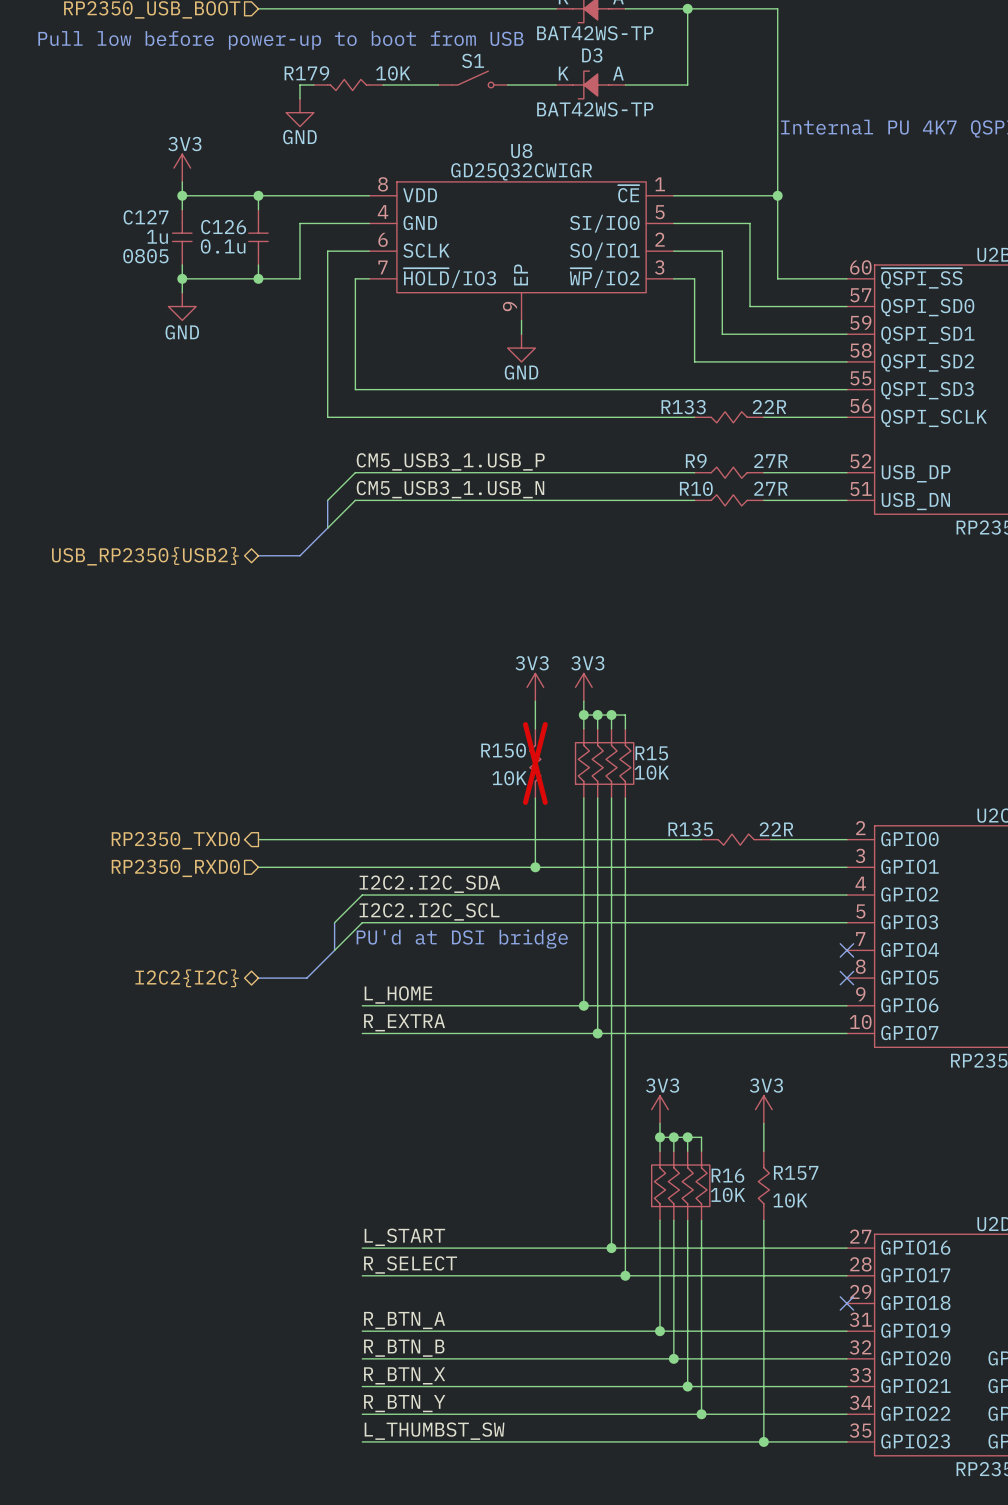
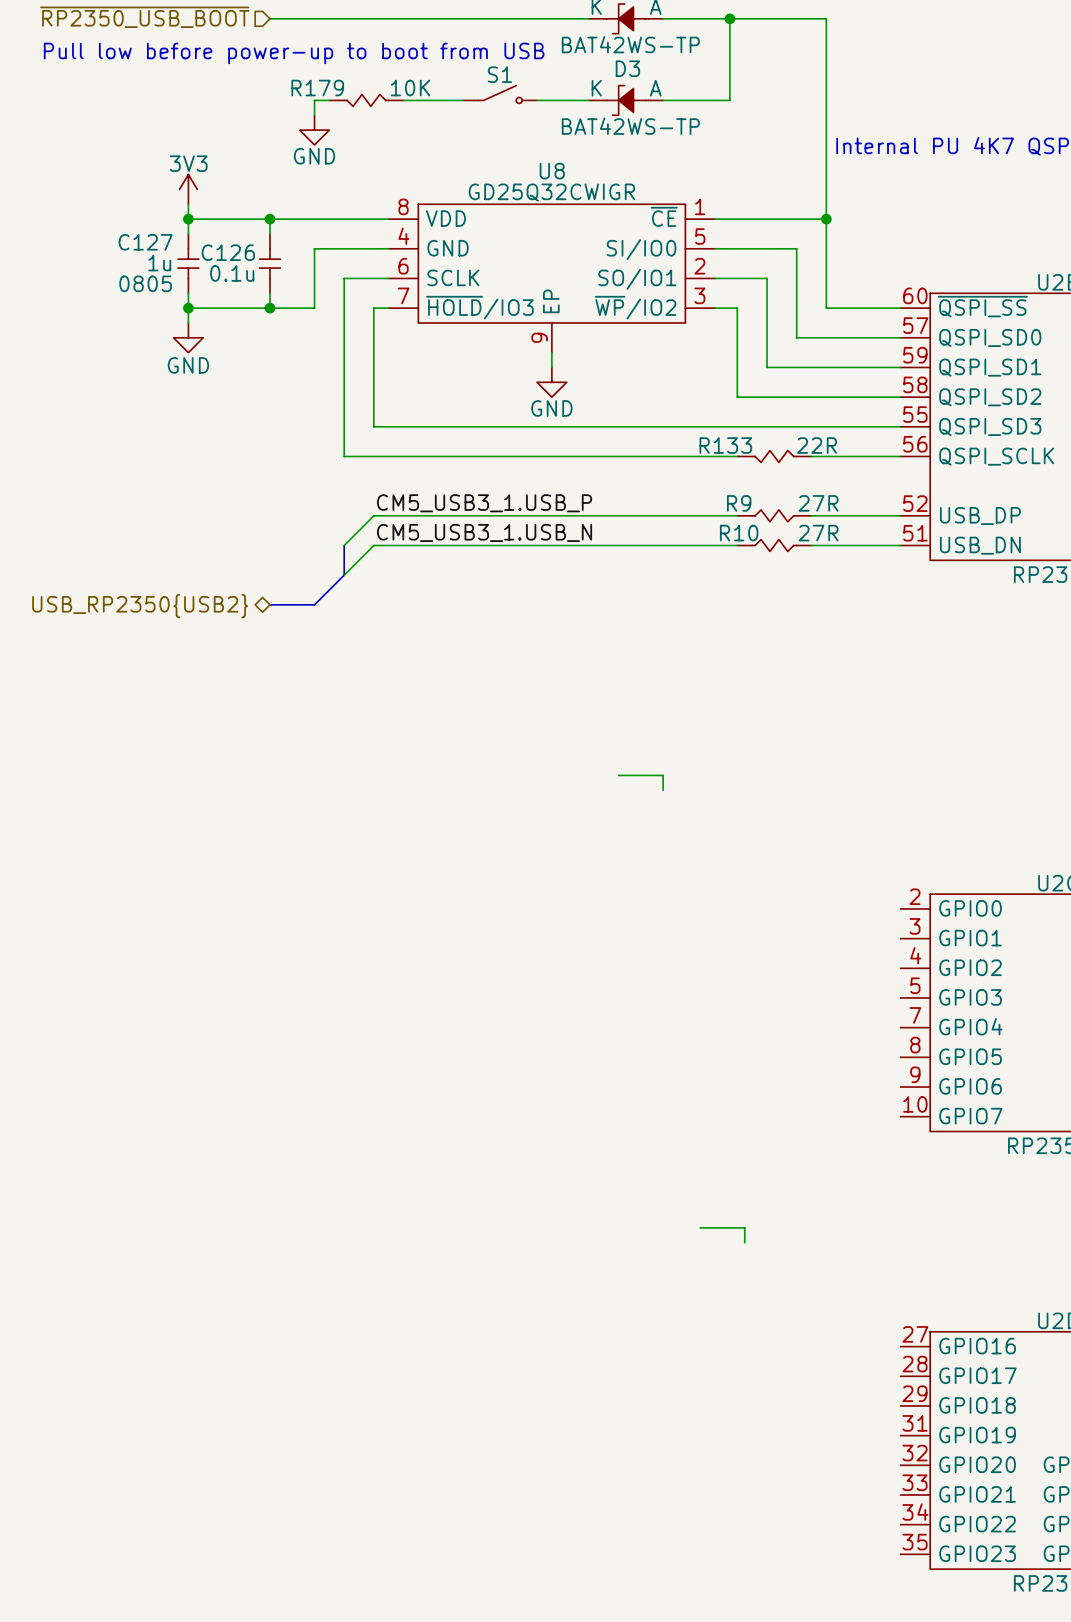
power symbol: 3V3 (535, 687) -> none
power symbol: 3V3 (583, 687) -> none
wire: (535, 701) (535, 728) -> none
wire: (583, 701) (583, 728) -> none
junction: (583, 715) -> none
wire: (597, 715) (597, 728) -> none
junction: (597, 715) -> none
wire: (611, 715) (611, 728) -> none
junction: (611, 715) -> none
R150: 10K (535, 763) -> none
R15: 10K (604, 763) -> none
wire: (535, 798) (535, 867) -> none
wire: (583, 798) (583, 1005) -> none
wire: (597, 798) (597, 1033) -> none
wire: (611, 798) (611, 1248) -> none
wire: (625, 798) (625, 1275) -> none
wire: (258, 839) (701, 839) -> none
R135: 22R (736, 839) -> none
wire: (770, 839) (846, 839) -> none
hierarchical label: RP2350_TXD0 (175, 840) -> none
wire: (258, 867) (846, 867) -> none
junction: (535, 867) -> none
hierarchical label: RP2350_RXD0 (175, 868) -> none
label: I2C2.I2C_SDA (429, 884) -> none
wire: (362, 895) (334, 922) -> none
wire: (362, 895) (846, 895) -> none
label: I2C2.I2C_SCL (429, 911) -> none
bus: (334, 922) (334, 950) (306, 978) (258, 978) -> none
wire: (846, 922) (362, 922) (334, 950) -> none
text: PU'd at DSI bridge (462, 939) -> none
no-connect mark: (846, 950) -> none
hierarchical label: I2C2{I2C} (187, 978) -> none
no-connect mark: (846, 978) -> none
label: L_HOME (398, 994) -> none
wire: (362, 1005) (846, 1005) -> none
junction: (583, 1005) -> none
label: R_EXTRA (404, 1022) -> none
wire: (362, 1033) (846, 1033) -> none
junction: (597, 1033) -> none
power symbol: 3V3 (659, 1109) -> none
power symbol: 3V3 (763, 1109) -> none
wire: (659, 1123) (659, 1151) -> none
wire: (763, 1123) (763, 1151) -> none
junction: (659, 1137) -> none
wire: (673, 1137) (673, 1151) -> none
junction: (673, 1137) -> none
wire: (687, 1137) (687, 1151) -> none
junction: (687, 1137) -> none
R16: 10K (680, 1185) -> none
R157: 10K (763, 1185) -> none
wire: (659, 1220) (659, 1331) -> none
wire: (673, 1220) (673, 1358) -> none
wire: (687, 1220) (687, 1386) -> none
wire: (701, 1220) (701, 1414) -> none
wire: (763, 1220) (763, 1441) -> none
label: L_START (404, 1237) -> none
wire: (362, 1248) (846, 1248) -> none
junction: (611, 1248) -> none
label: R_SELECT (410, 1264) -> none
wire: (362, 1275) (846, 1275) -> none
junction: (625, 1275) -> none
no-connect mark: (846, 1303) -> none
label: R_BTN_A (404, 1320) -> none
wire: (362, 1331) (846, 1331) -> none
junction: (659, 1331) -> none
label: R_BTN_B (404, 1348) -> none
wire: (362, 1358) (846, 1358) -> none
junction: (673, 1358) -> none
label: R_BTN_X (404, 1375) -> none
wire: (362, 1386) (846, 1386) -> none
junction: (687, 1386) -> none
label: R_BTN_Y (404, 1403) -> none
wire: (362, 1414) (846, 1414) -> none
junction: (701, 1414) -> none
label: L_THUMBST_SW (434, 1431) -> none
wire: (362, 1441) (846, 1441) -> none
junction: (763, 1441) -> none

